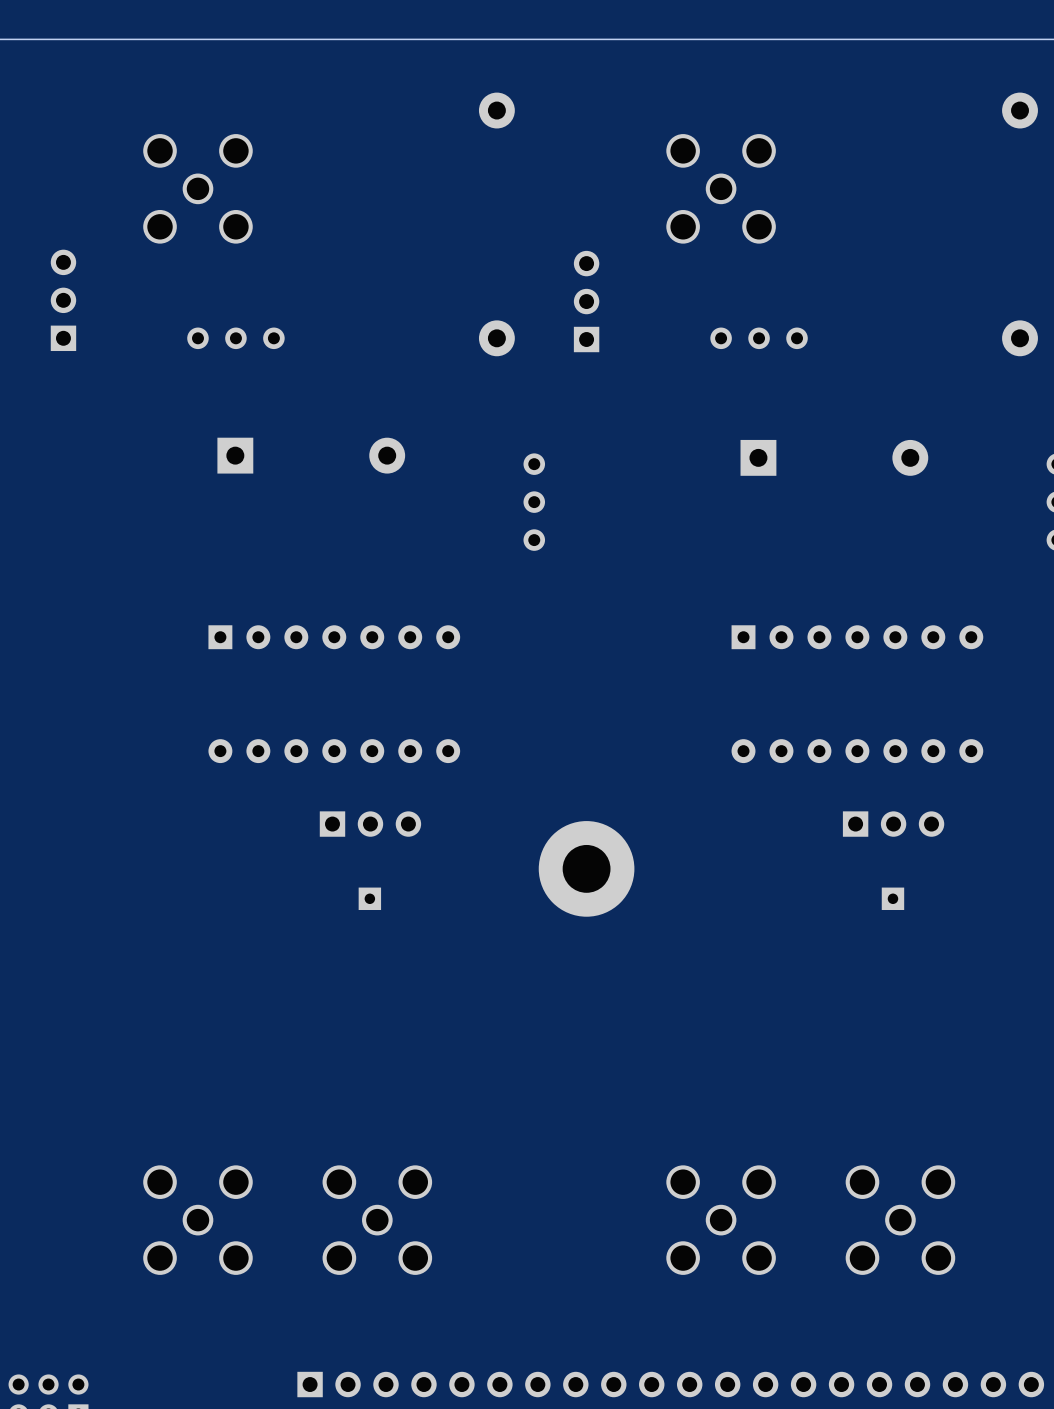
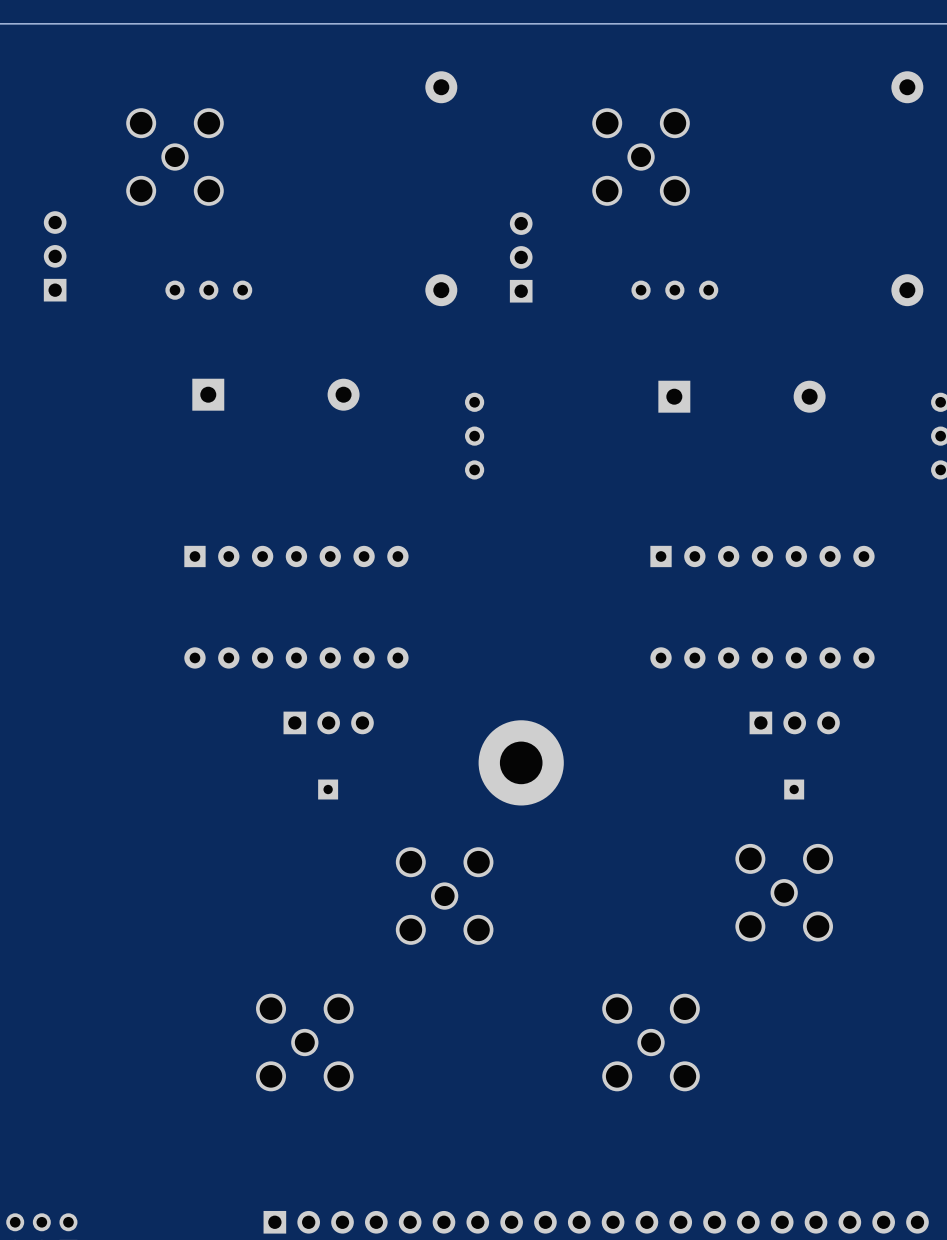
part: none -> (784, 892)
part: none -> (444, 896)
part: (197, 1220) -> none
part position: (377, 1220) -> (304, 1042)
part position: (721, 1220) -> (651, 1042)
part: (900, 1220) -> none

